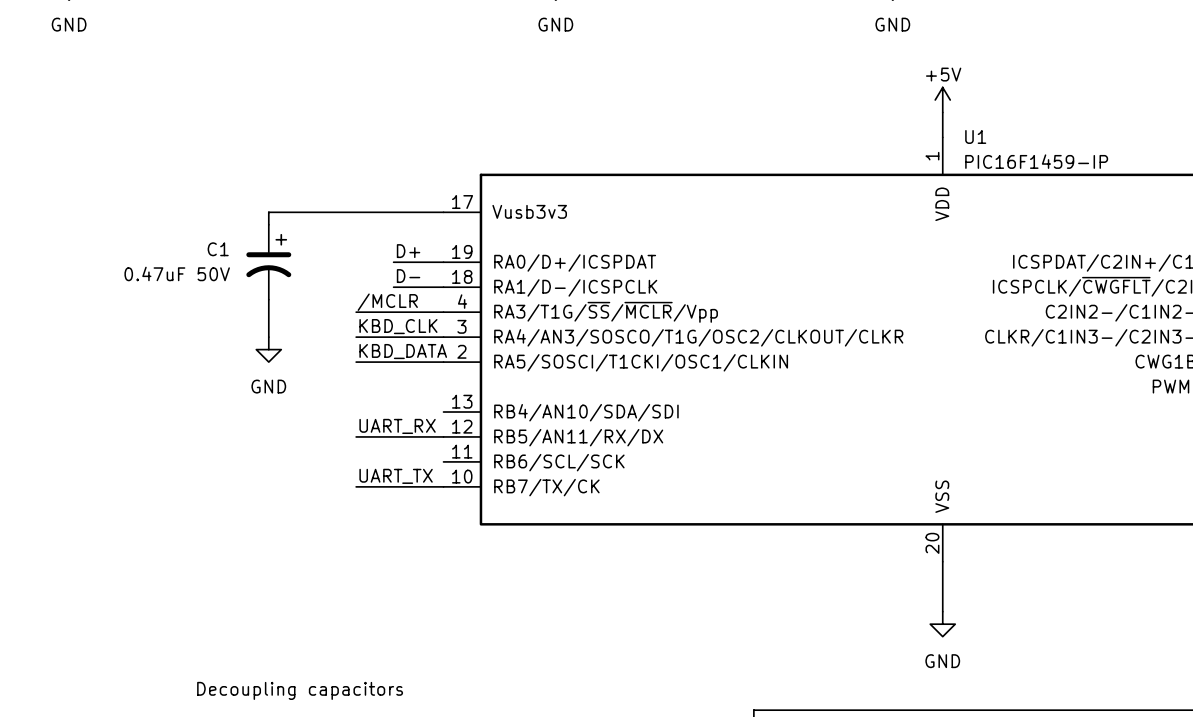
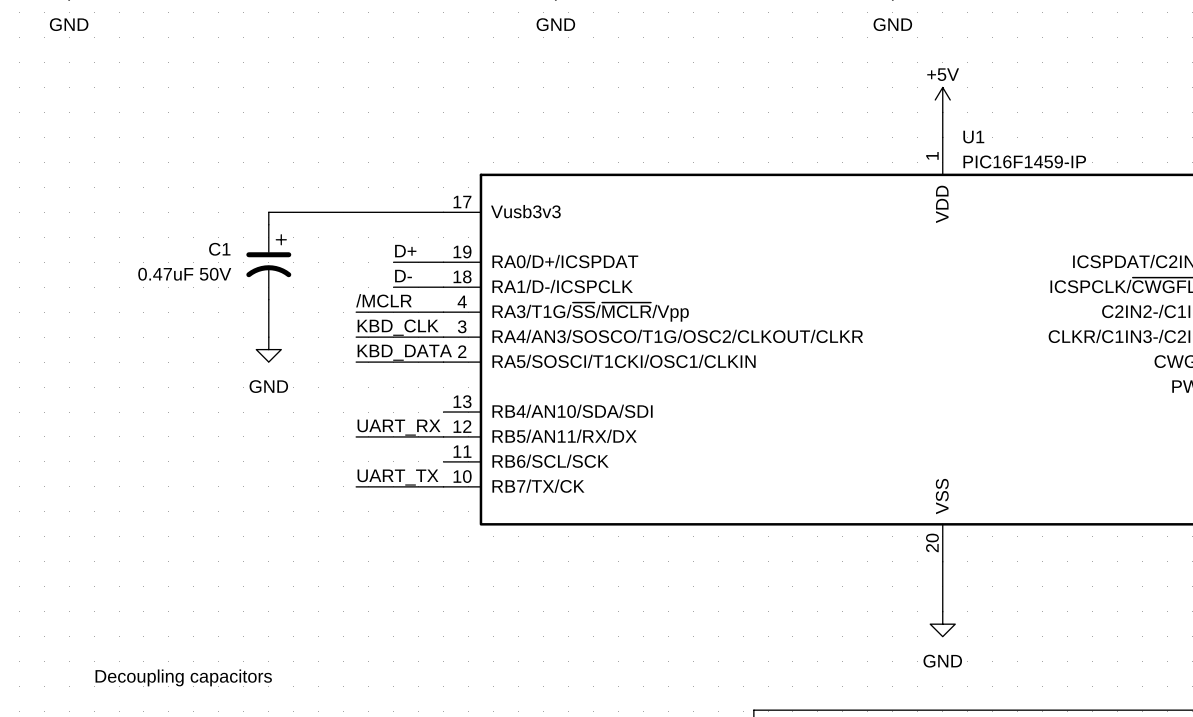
text position: Decoupling capacitors (300, 690) -> Decoupling capacitors (183, 677)

